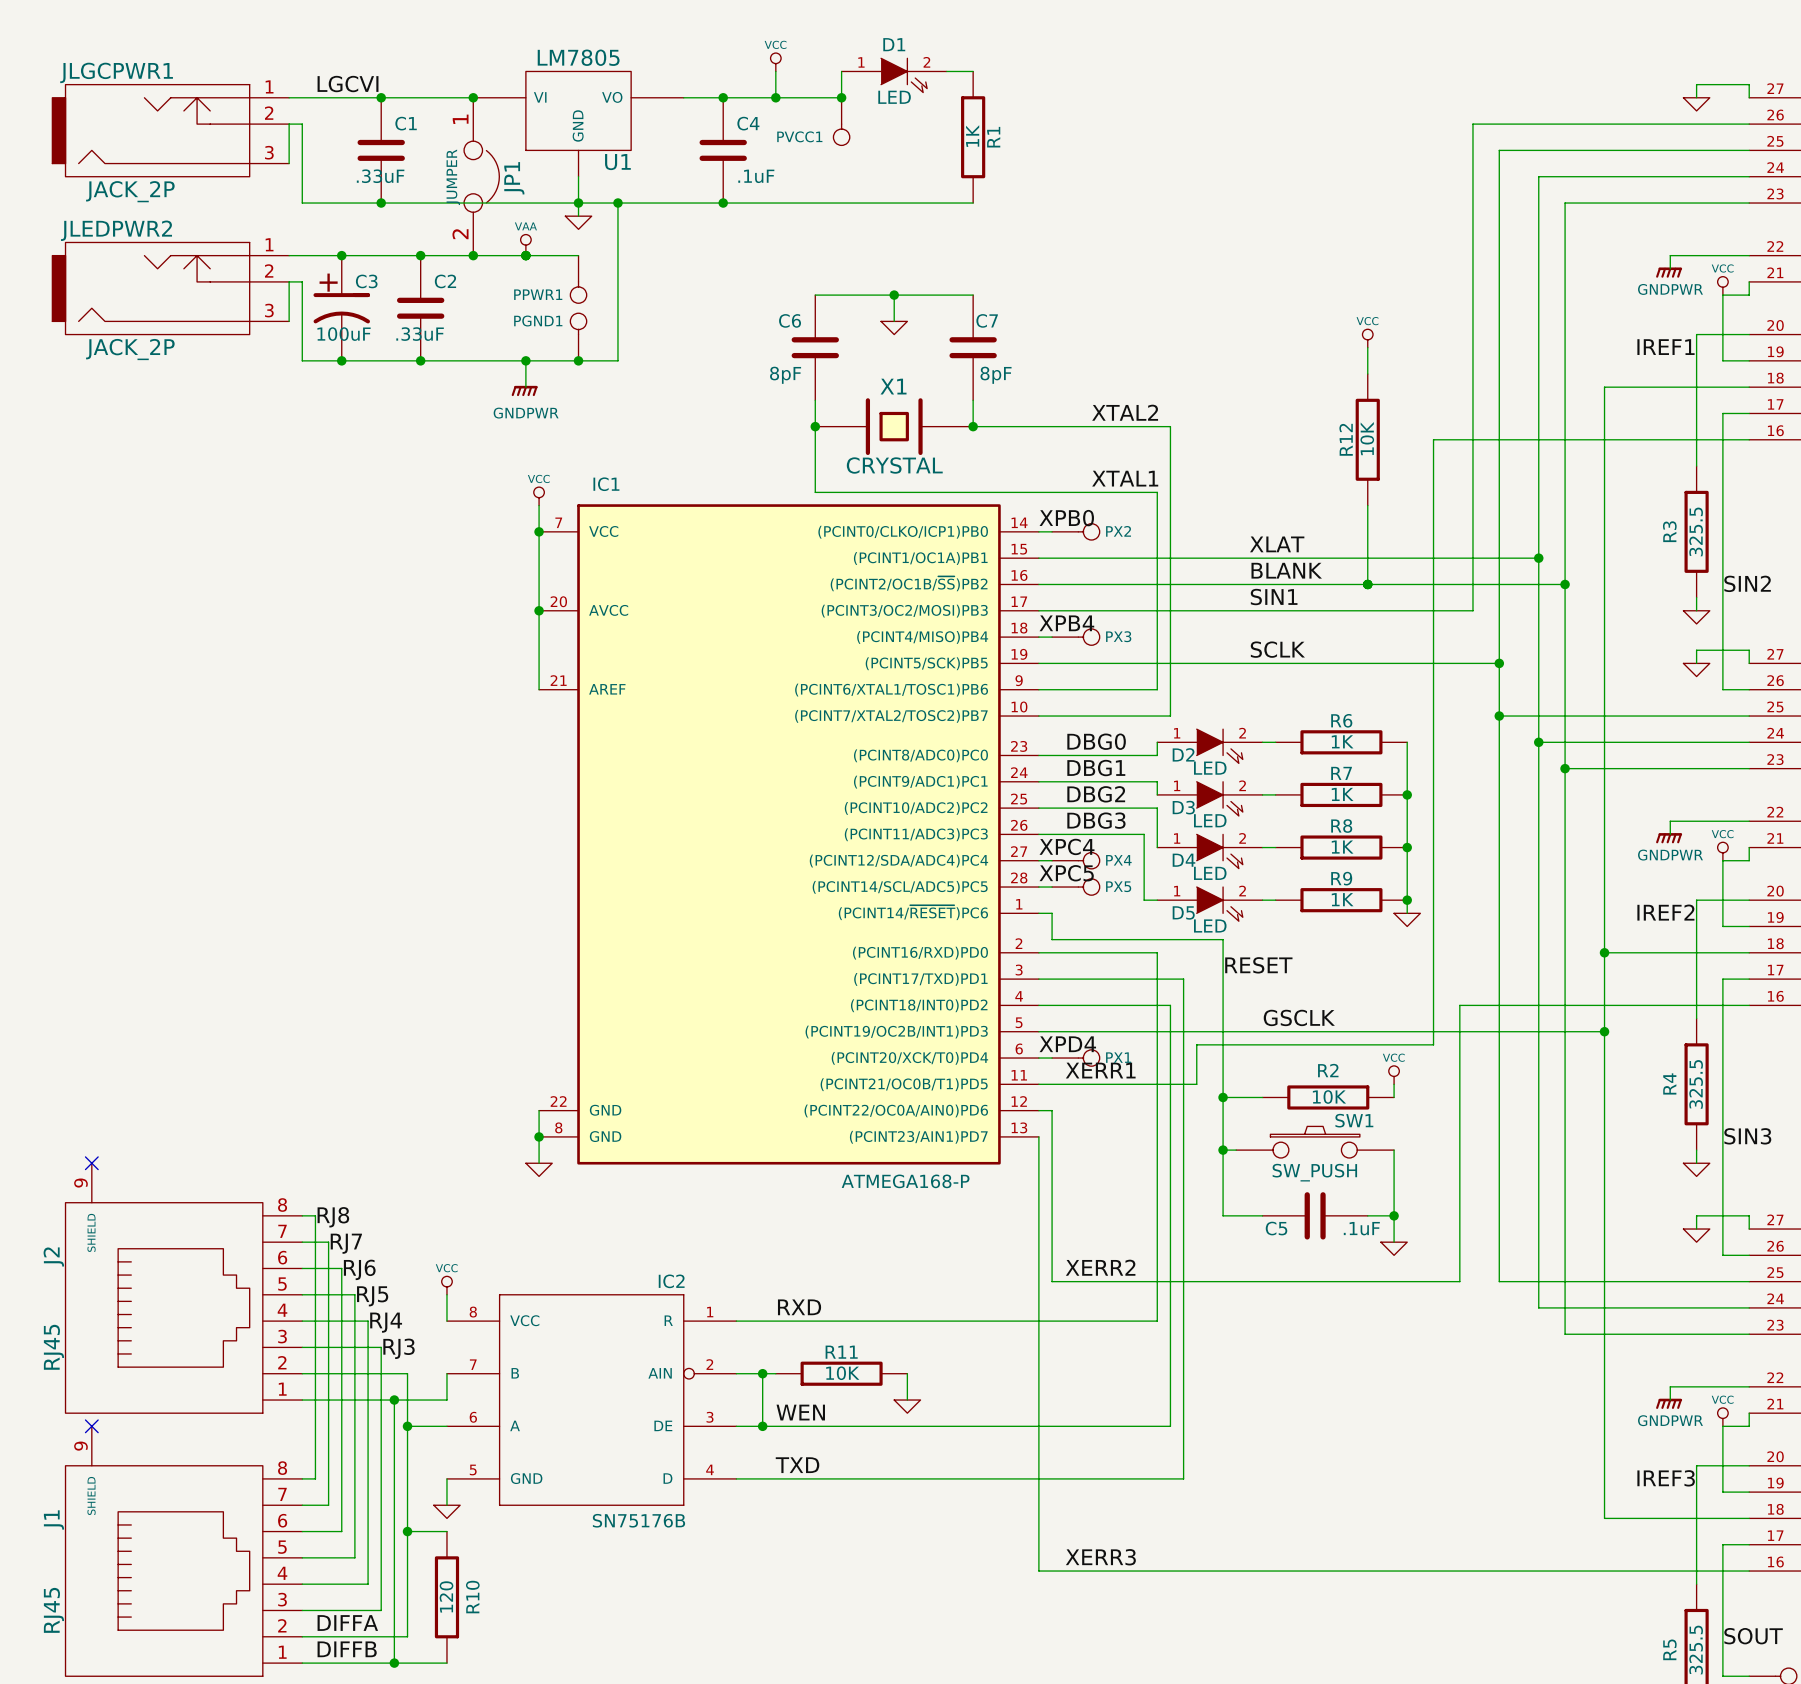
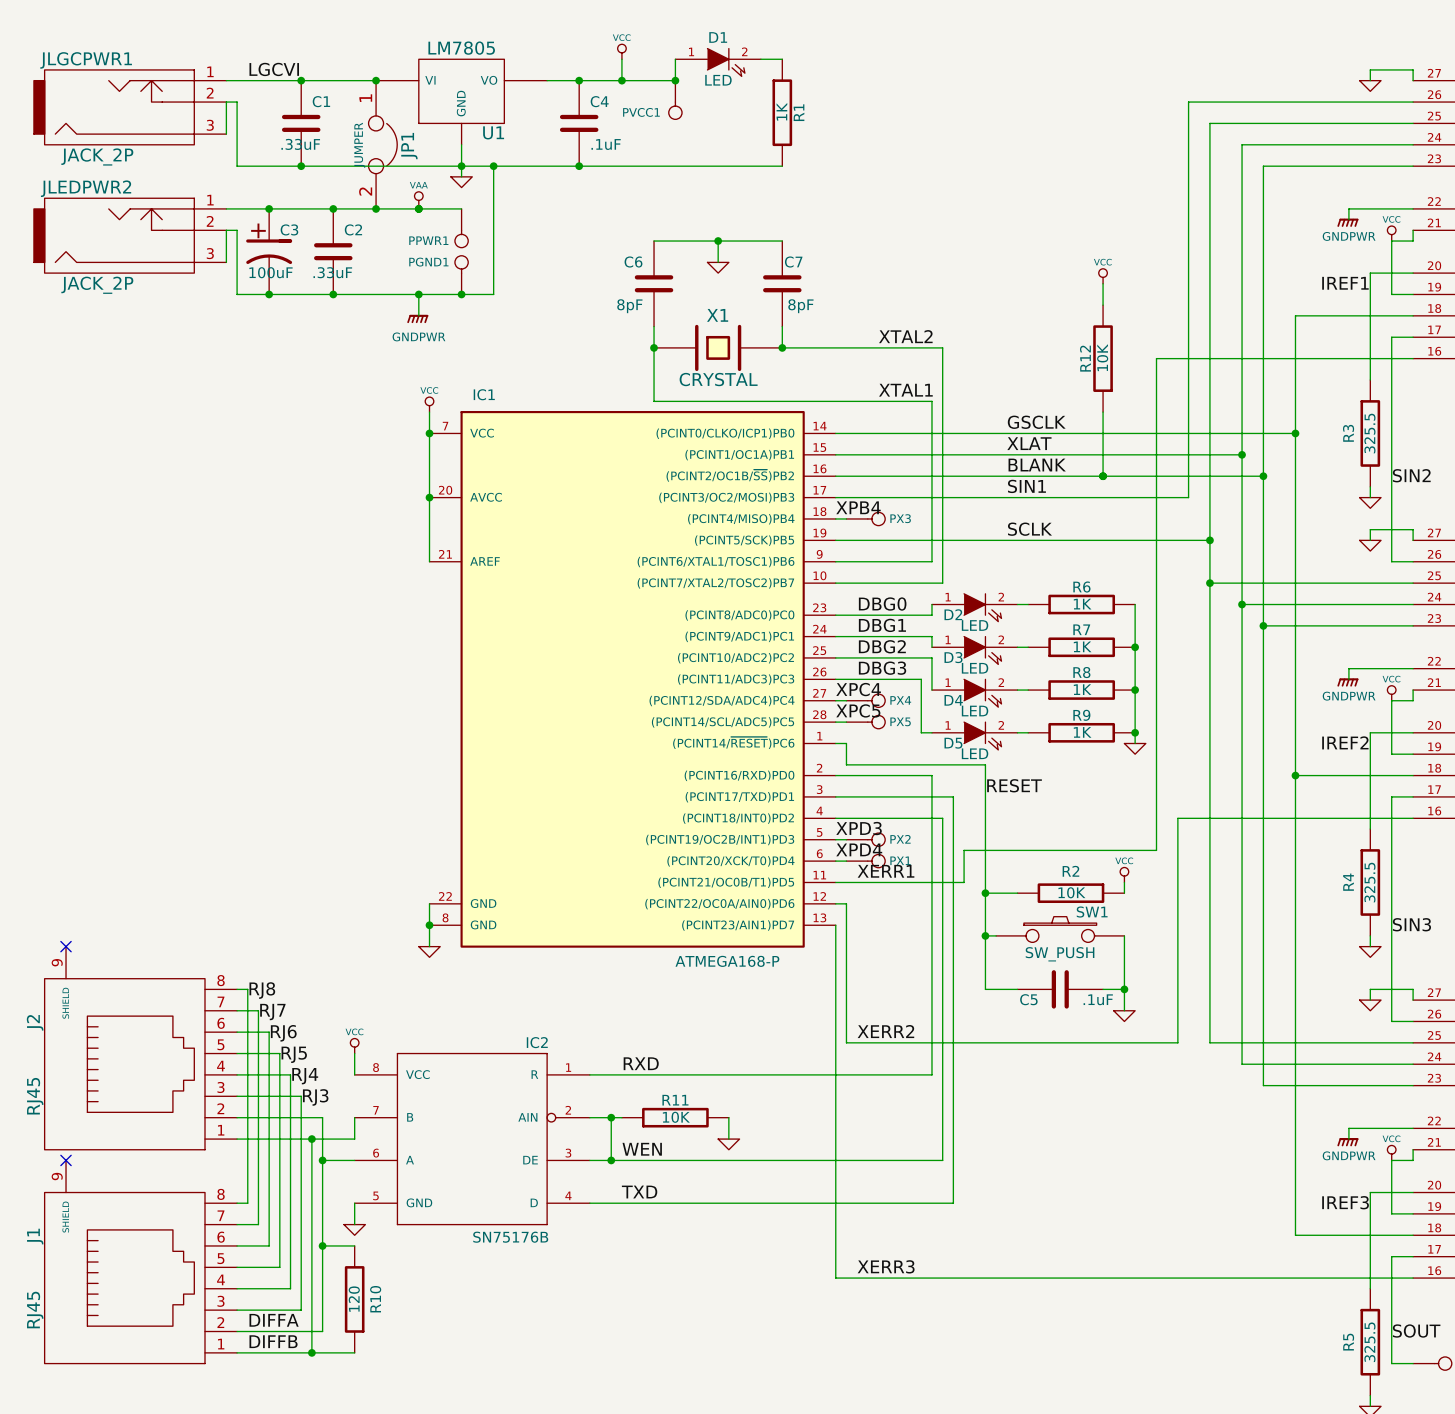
label: XPB0 (1066, 518) -> none
label: none -> GSCLK (1036, 422)
wire: none -> (846, 433) (1295, 433)
PX2 position: (1075, 531) -> (865, 839)
junction: none -> (1295, 433)
label: none -> XPD3 (859, 828)
label: GSCLK (1299, 1017) -> none
wire: (1052, 1031) (1604, 1031) -> none
junction: (1604, 1031) -> none

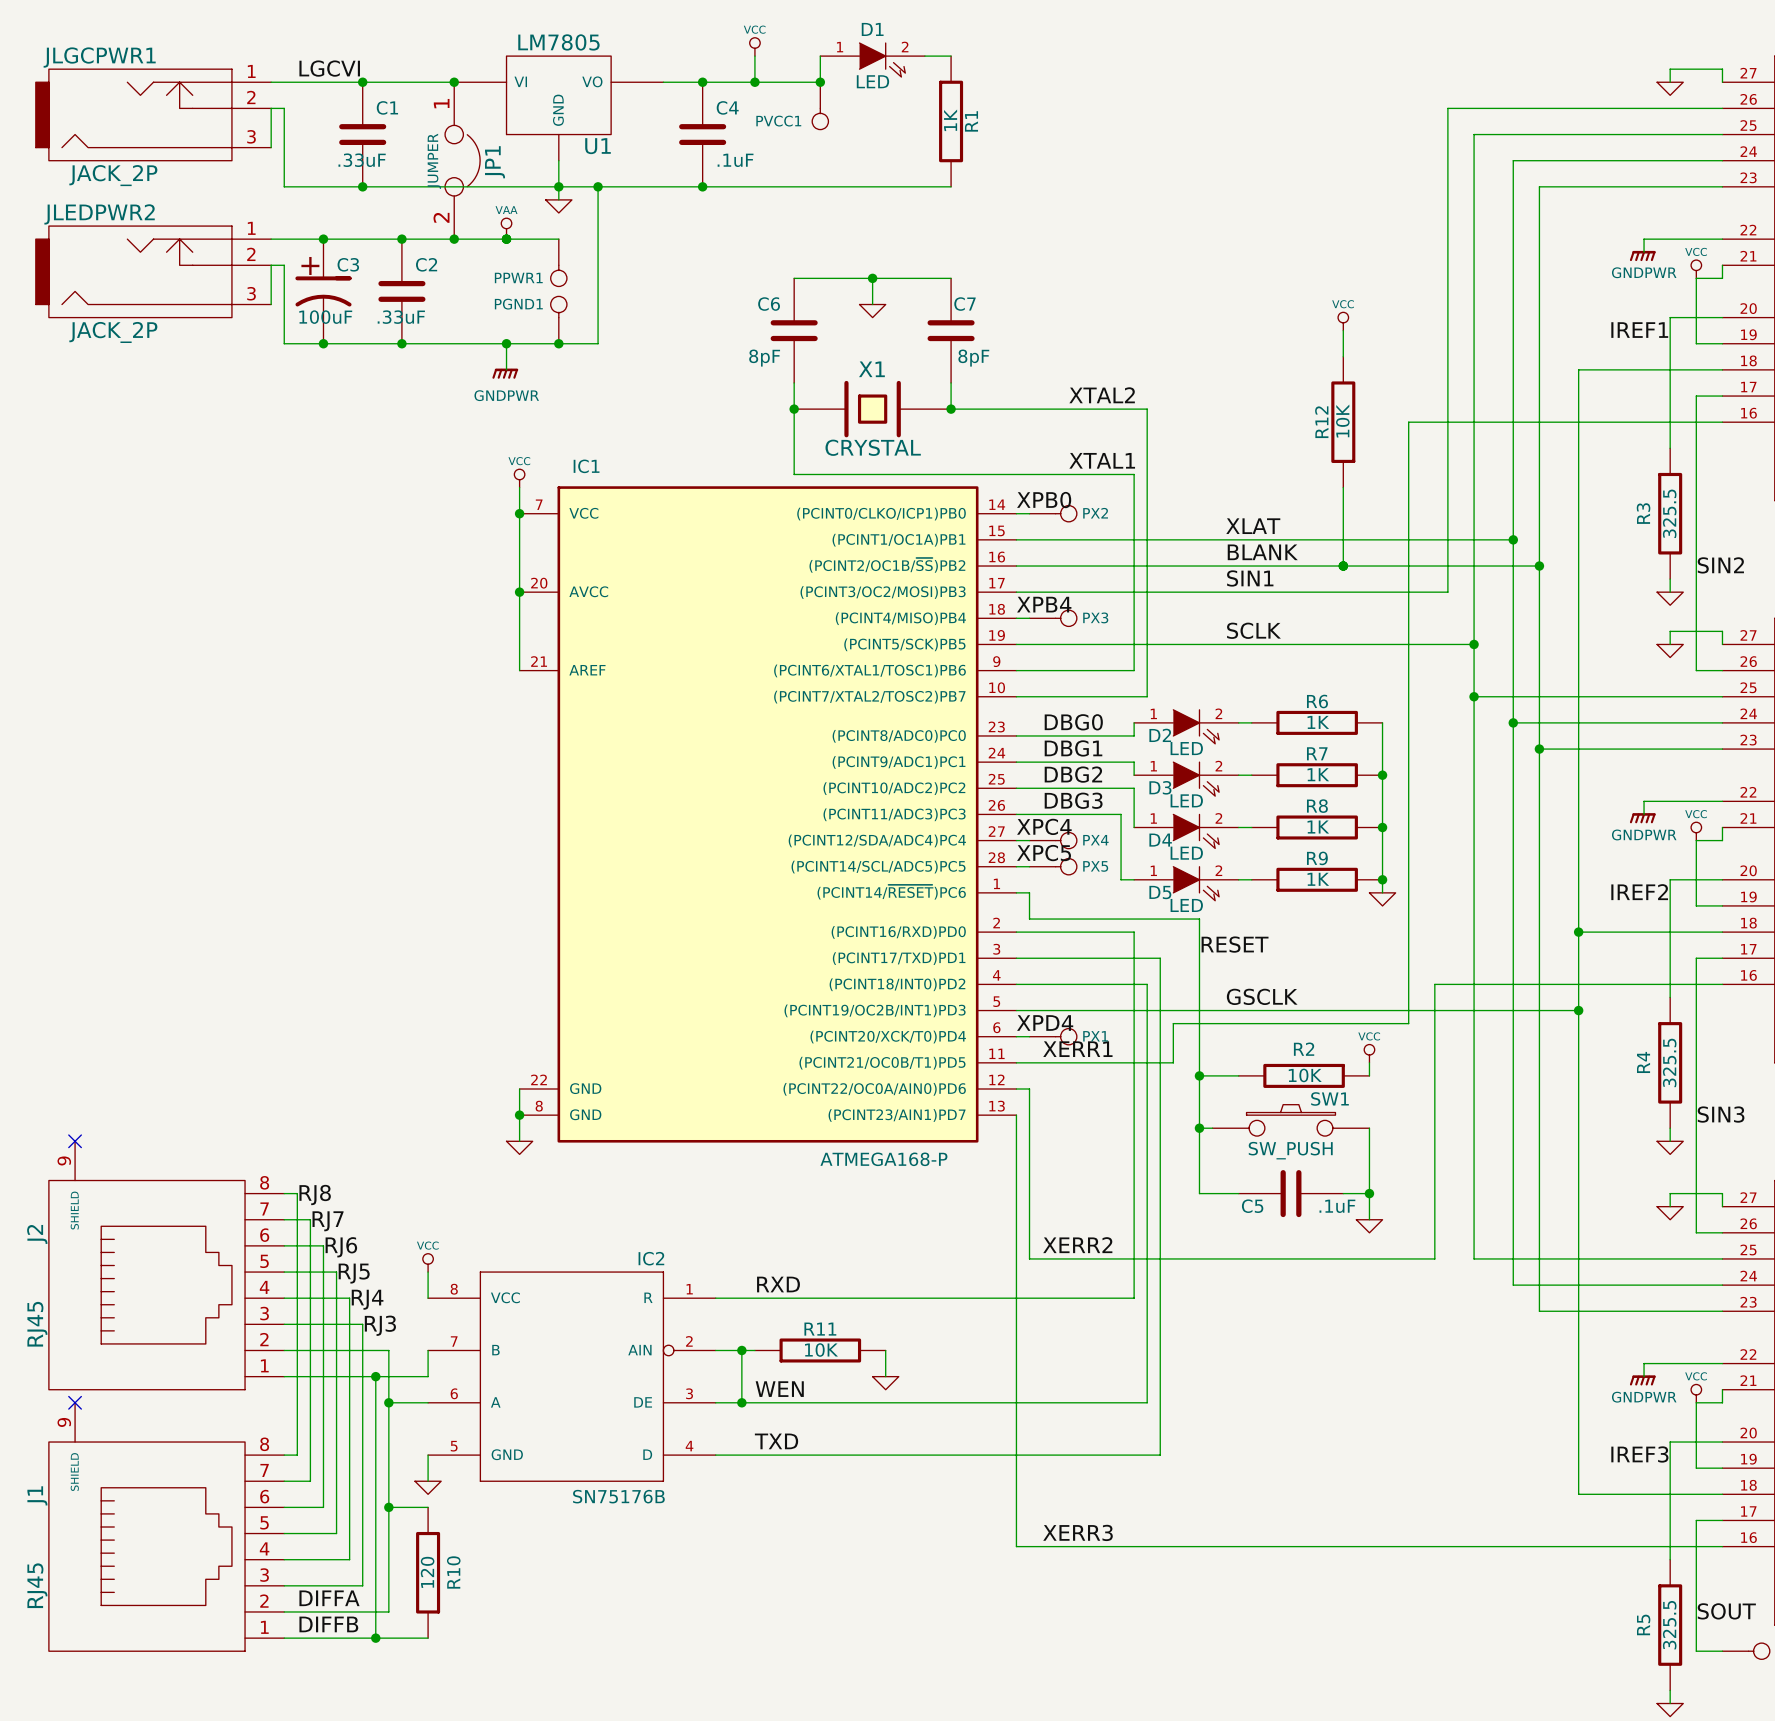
label: none -> XPB0 (1044, 500)
label: GSCLK (1036, 422) -> none
wire: (846, 433) (1295, 433) -> none
junction: (1295, 433) -> none
label: XPD3 (859, 828) -> none
label: none -> GSCLK (1262, 996)
wire: none -> (1029, 1010) (1578, 1010)
PX2 position: (865, 839) -> (1053, 513)
junction: none -> (1578, 1010)

